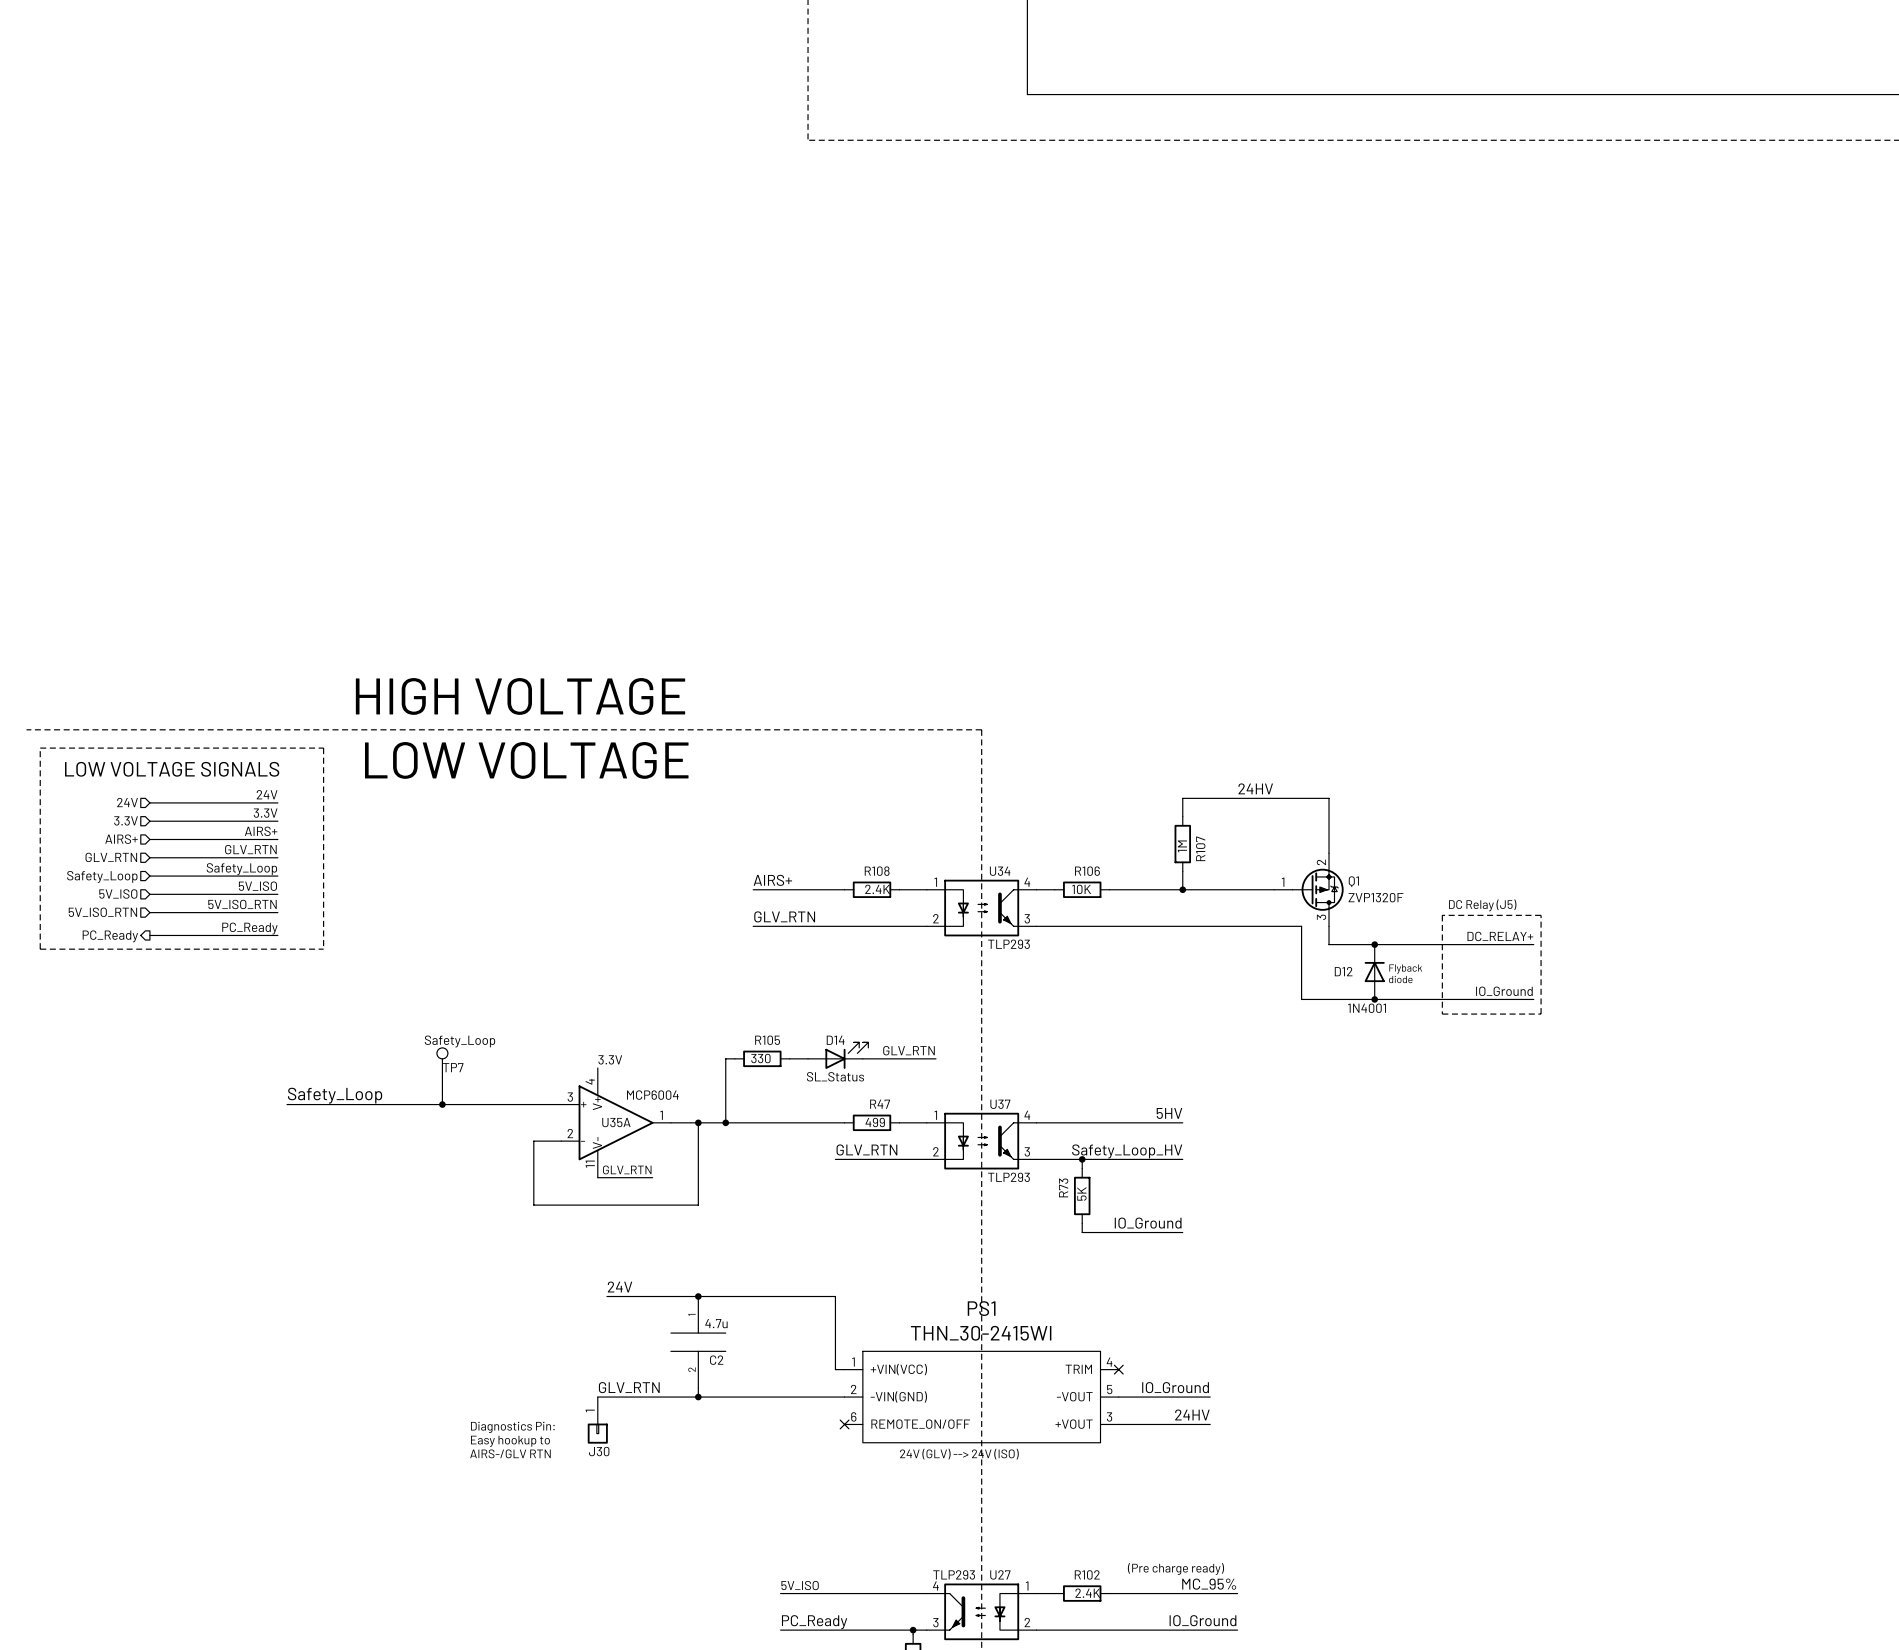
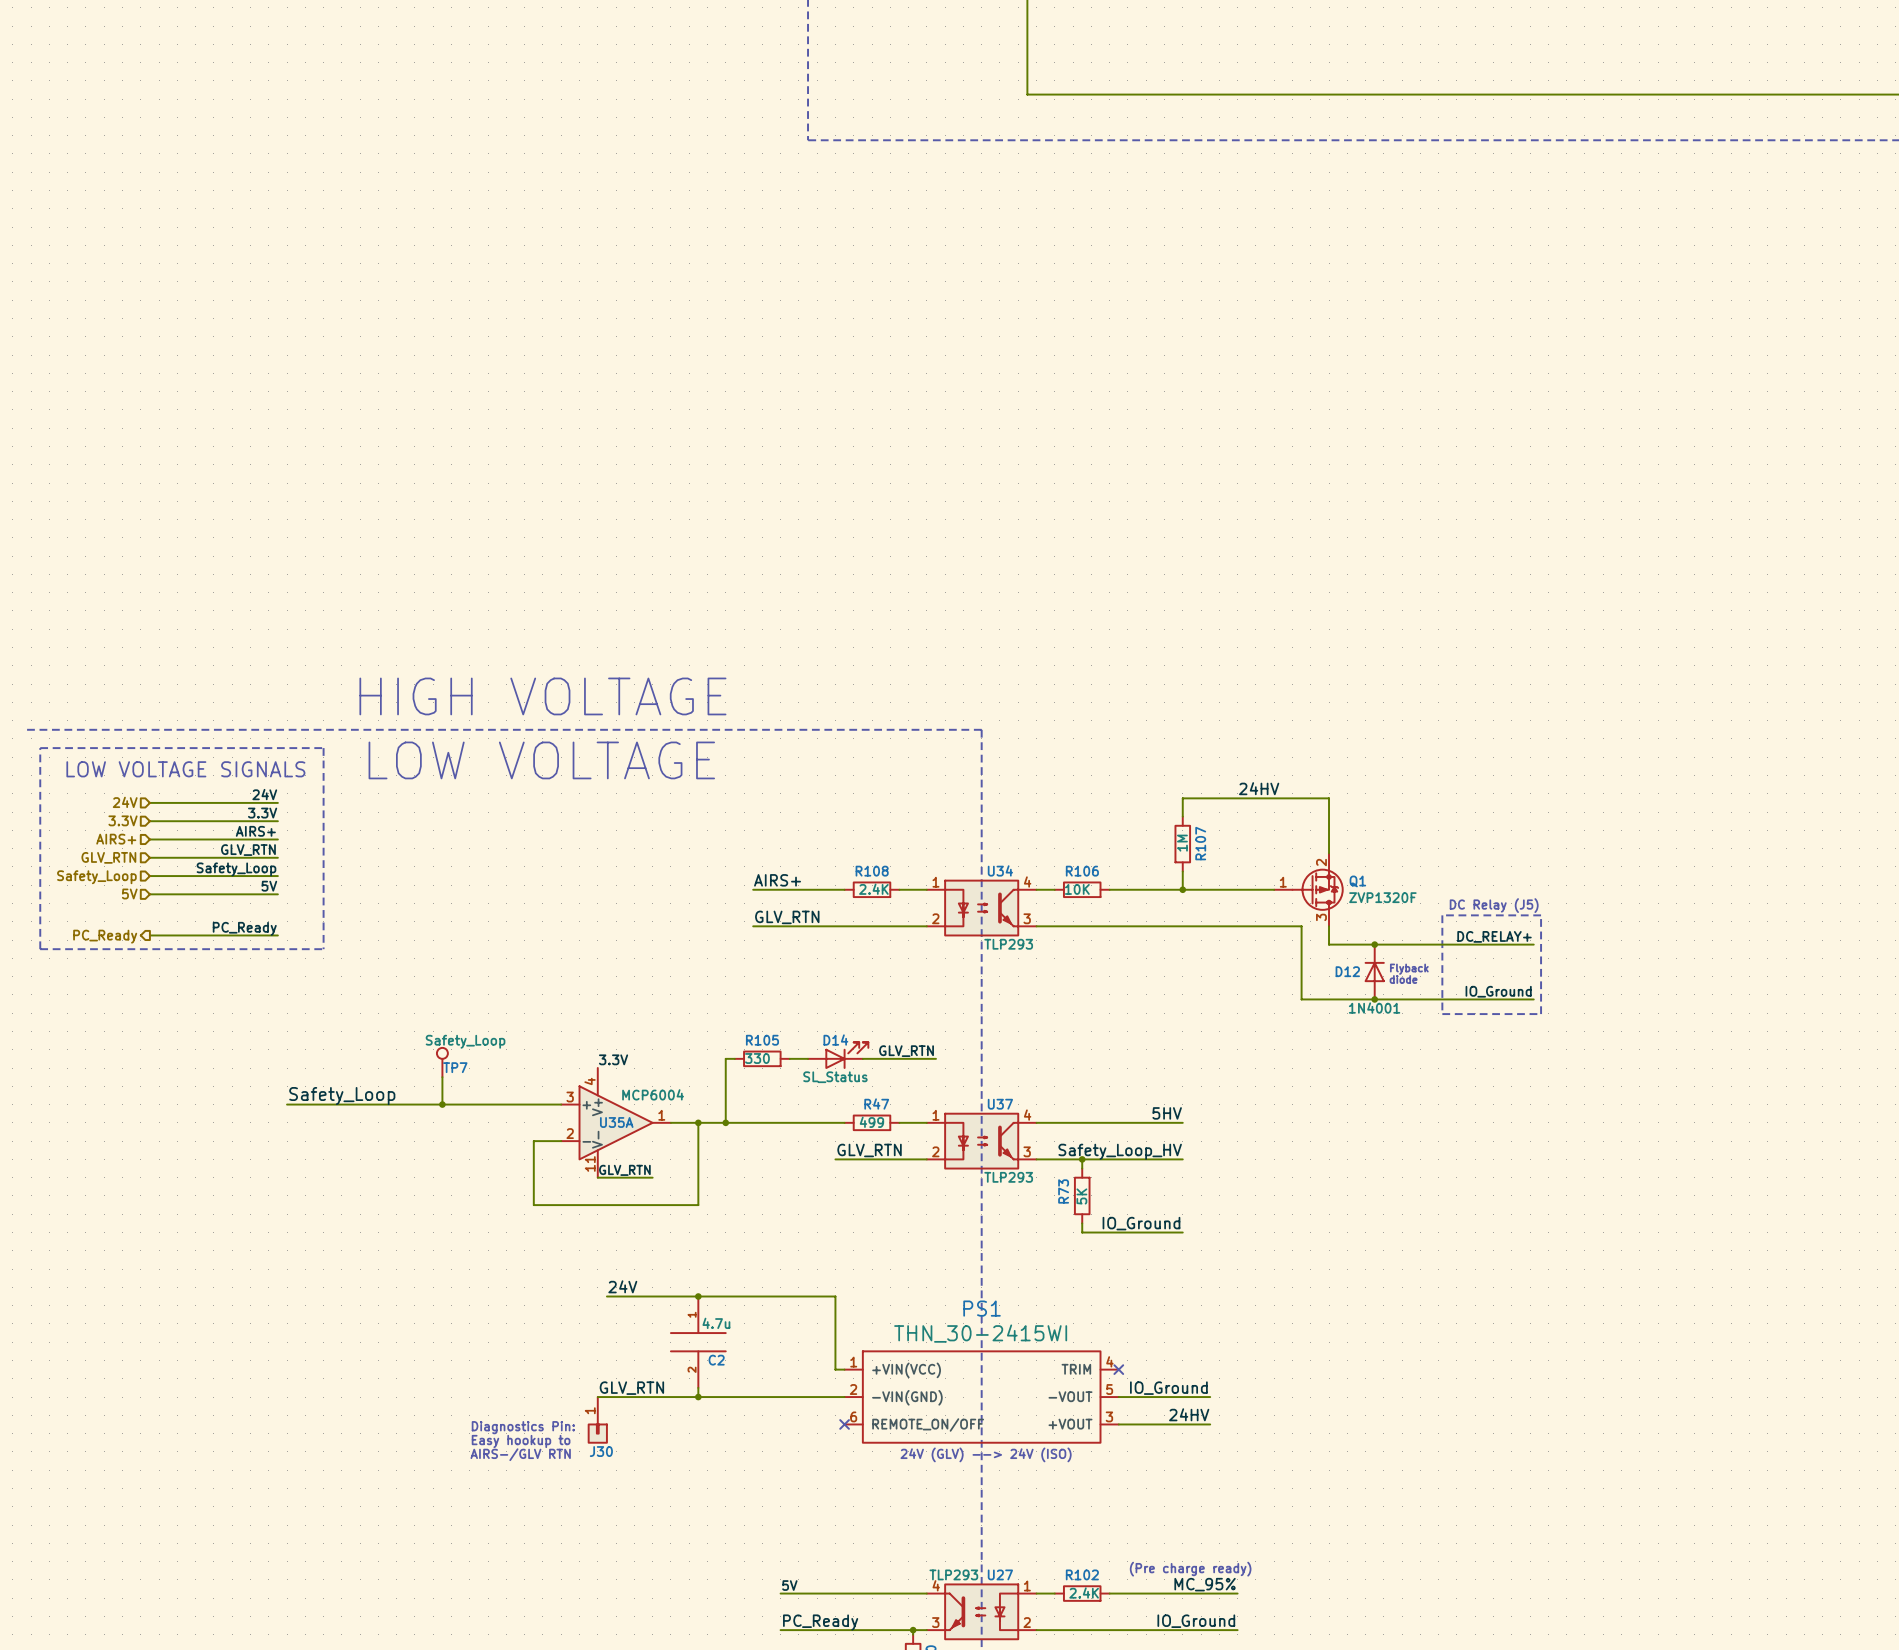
label: 5V_ISO (257, 886) -> 5V (269, 886)
hierarchical label: 5V_ISO (118, 893) -> 5V (129, 893)
label: 5V_ISO_RTN (242, 904) -> none
hierarchical label: 5V_ISO_RTN (102, 912) -> none
wire: (149, 912) (277, 912) -> none
label: 5V_ISO (800, 1585) -> 5V (789, 1585)

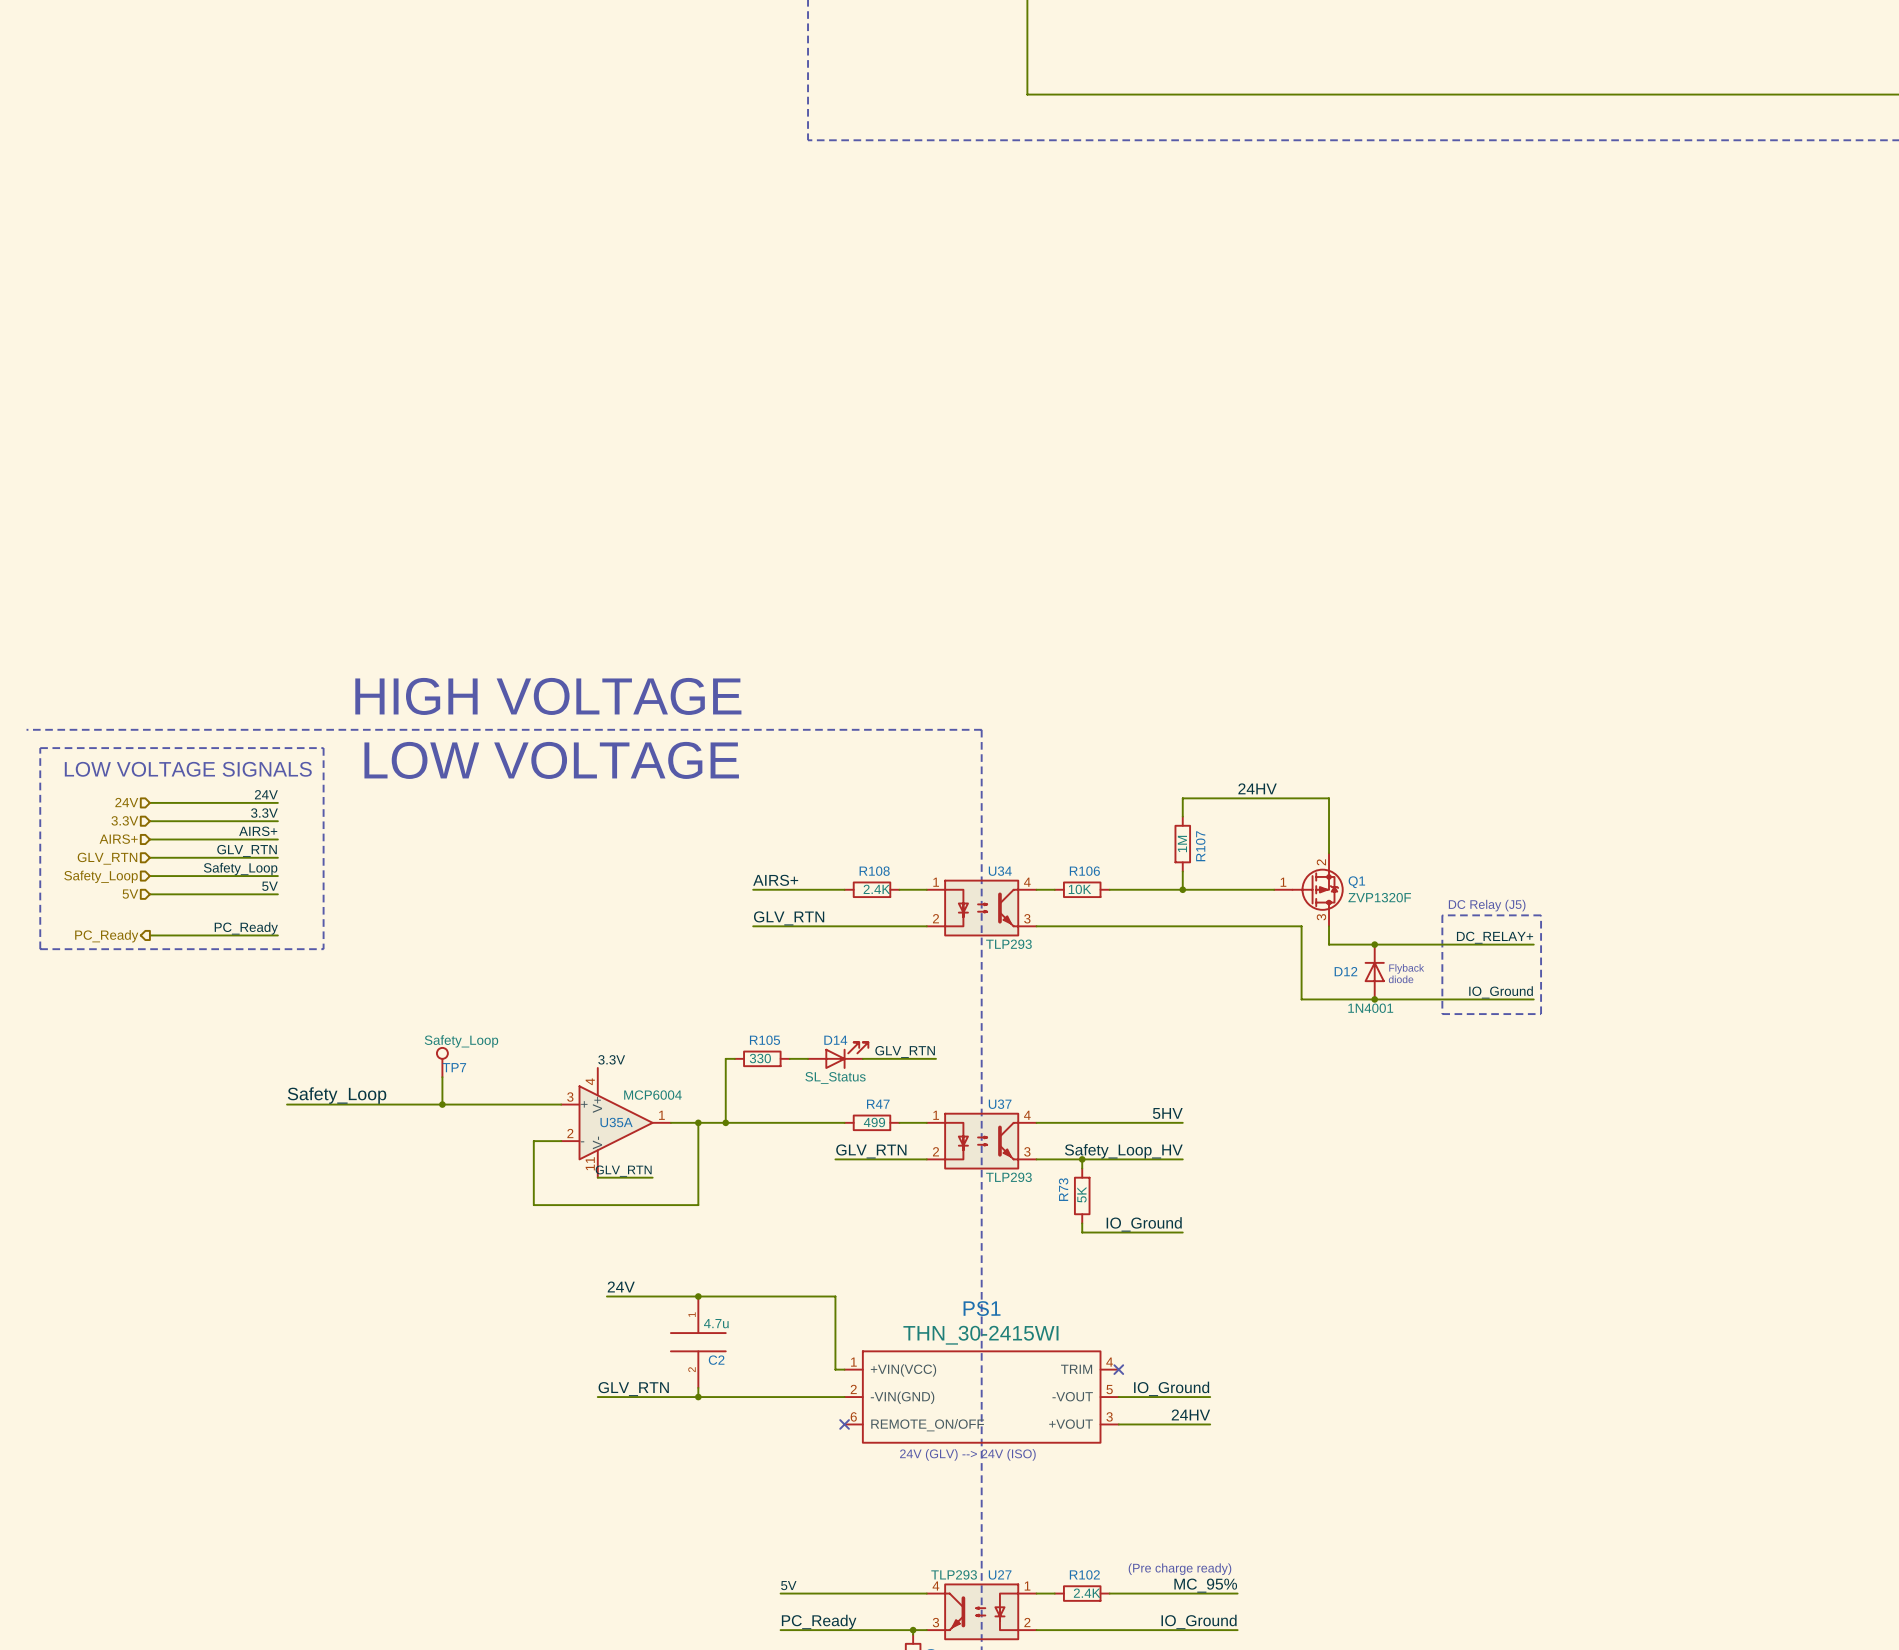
J30: (597, 1420) -> none
text: Diagnostics Pin: (523, 1427) -> none
text: Easy hookup to (521, 1441) -> none
text: AIRS-/GLV RTN (520, 1454) -> none

